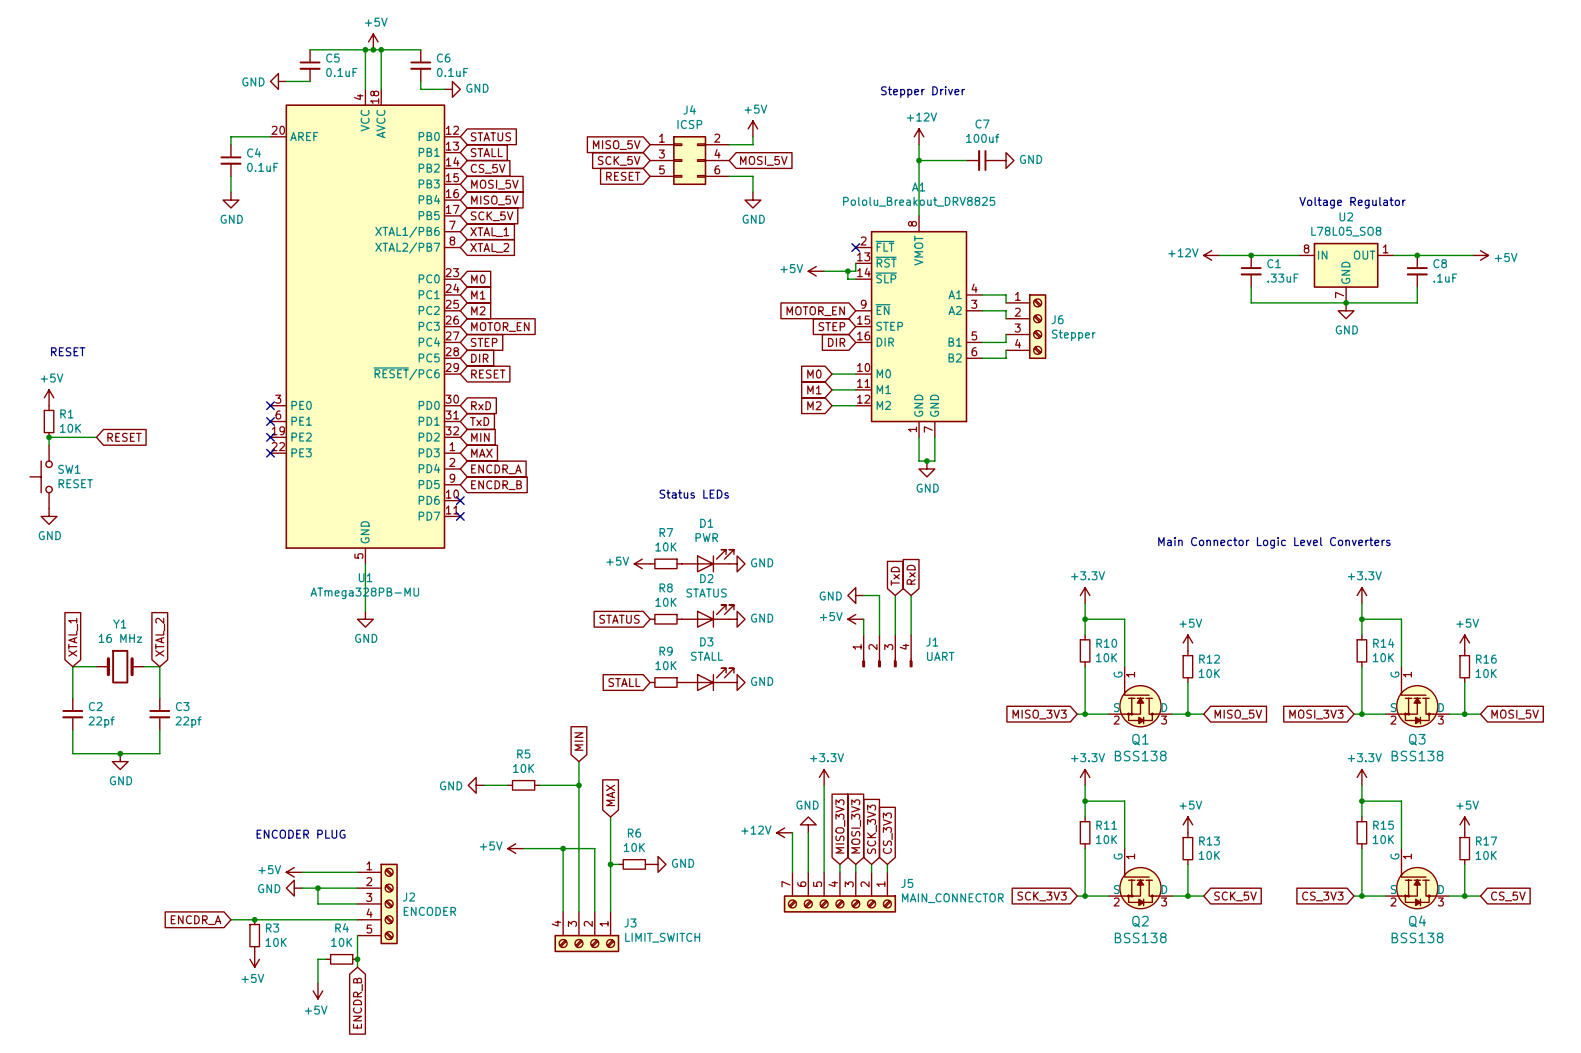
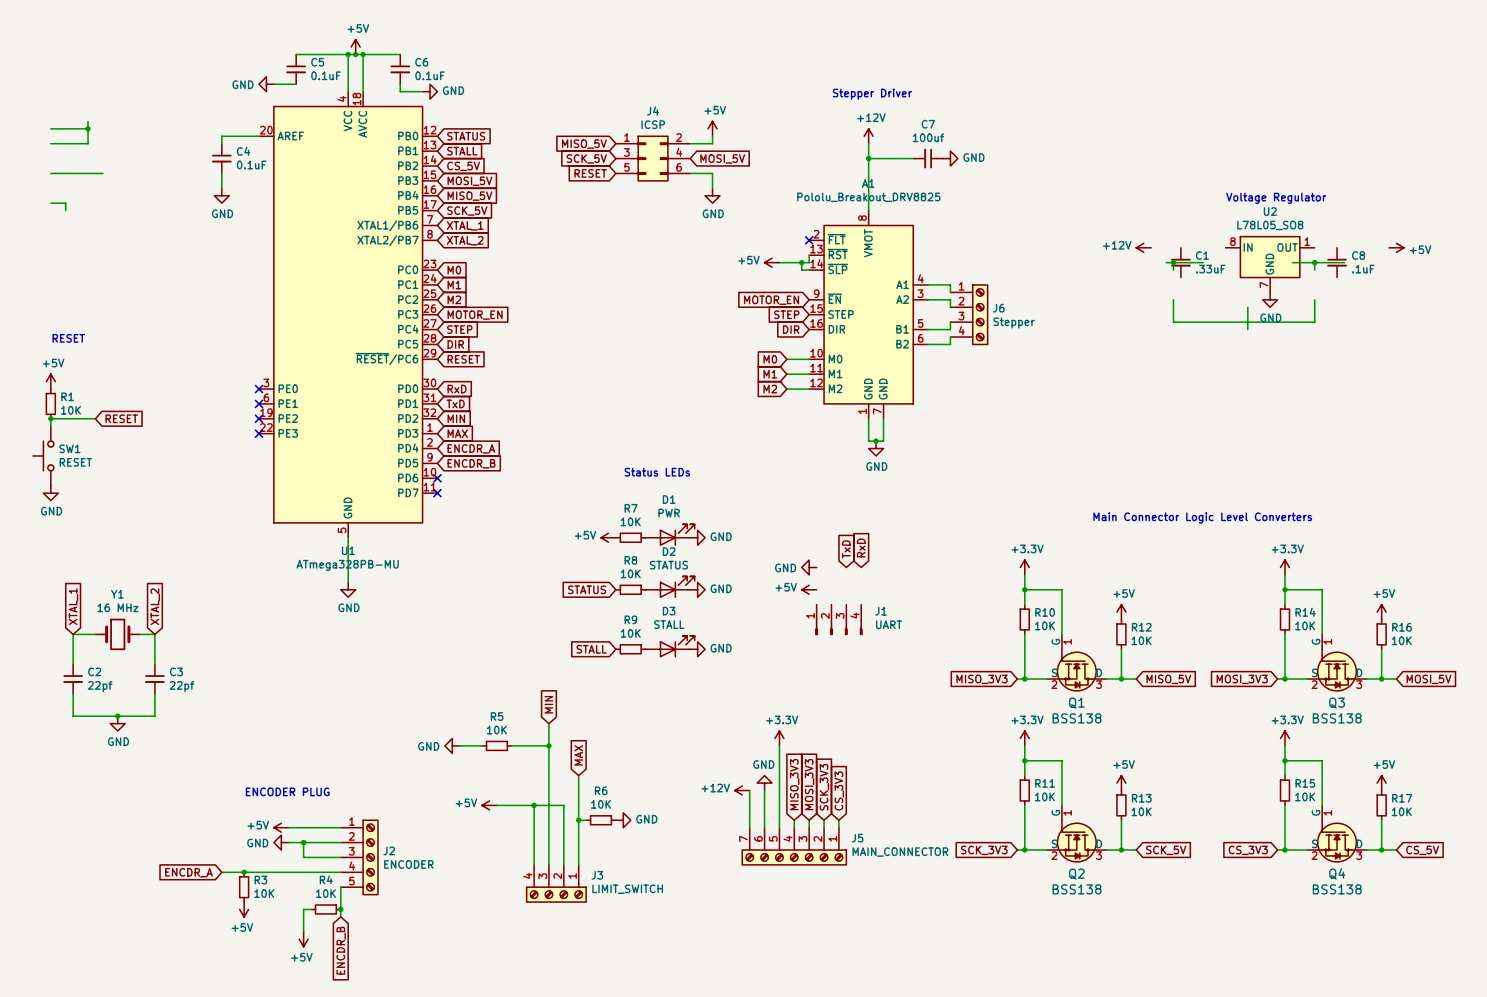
wire: none -> (88, 121) (88, 143) (50, 143)
wire: none -> (50, 128) (88, 128)
junction: none -> (88, 128)
wire: none -> (50, 173) (102, 173)
wire: none -> (50, 203) (65, 203) (65, 210)
wire: (1219, 255) (1298, 255) -> none
junction position: (1251, 255) -> (1173, 262)
wire: (1393, 255) (1472, 255) -> none
junction: (1417, 255) -> none
wire: none -> (1166, 262) (1203, 262)
wire: none -> (1173, 262) (1173, 270)
wire: none -> (1292, 262) (1344, 262)
wire: none -> (1314, 262) (1314, 270)
junction: none -> (1314, 262)
wire: (1251, 287) (1251, 302) (1417, 302) (1417, 287) -> none
junction: (1346, 302) -> none
wire: none -> (1173, 299) (1173, 322) (1314, 322) (1314, 299)
wire: none -> (1247, 307) (1247, 329)
wire: (863, 595) (879, 595) (879, 635) -> none
wire: (895, 595) (895, 635) -> none
wire: (911, 595) (911, 635) -> none
wire: (863, 619) (863, 635) -> none

